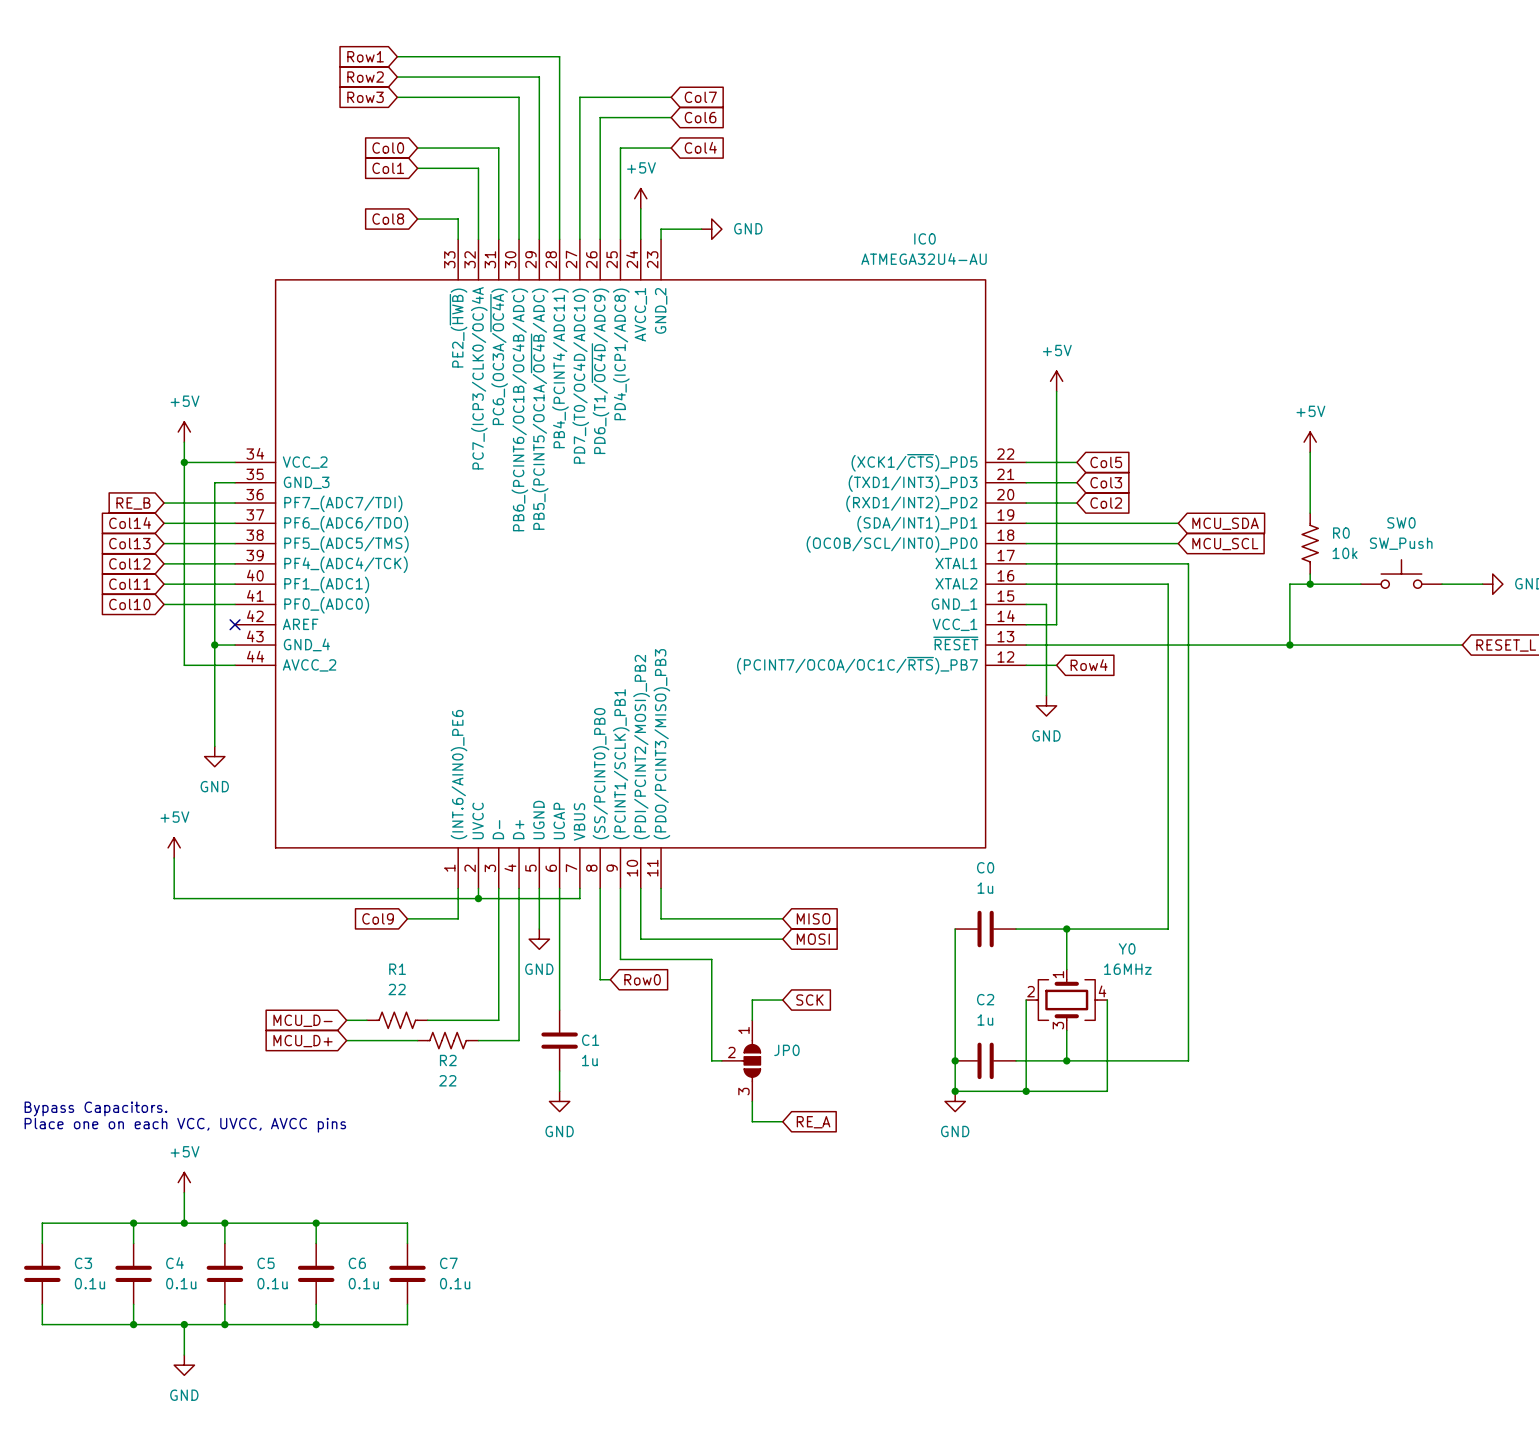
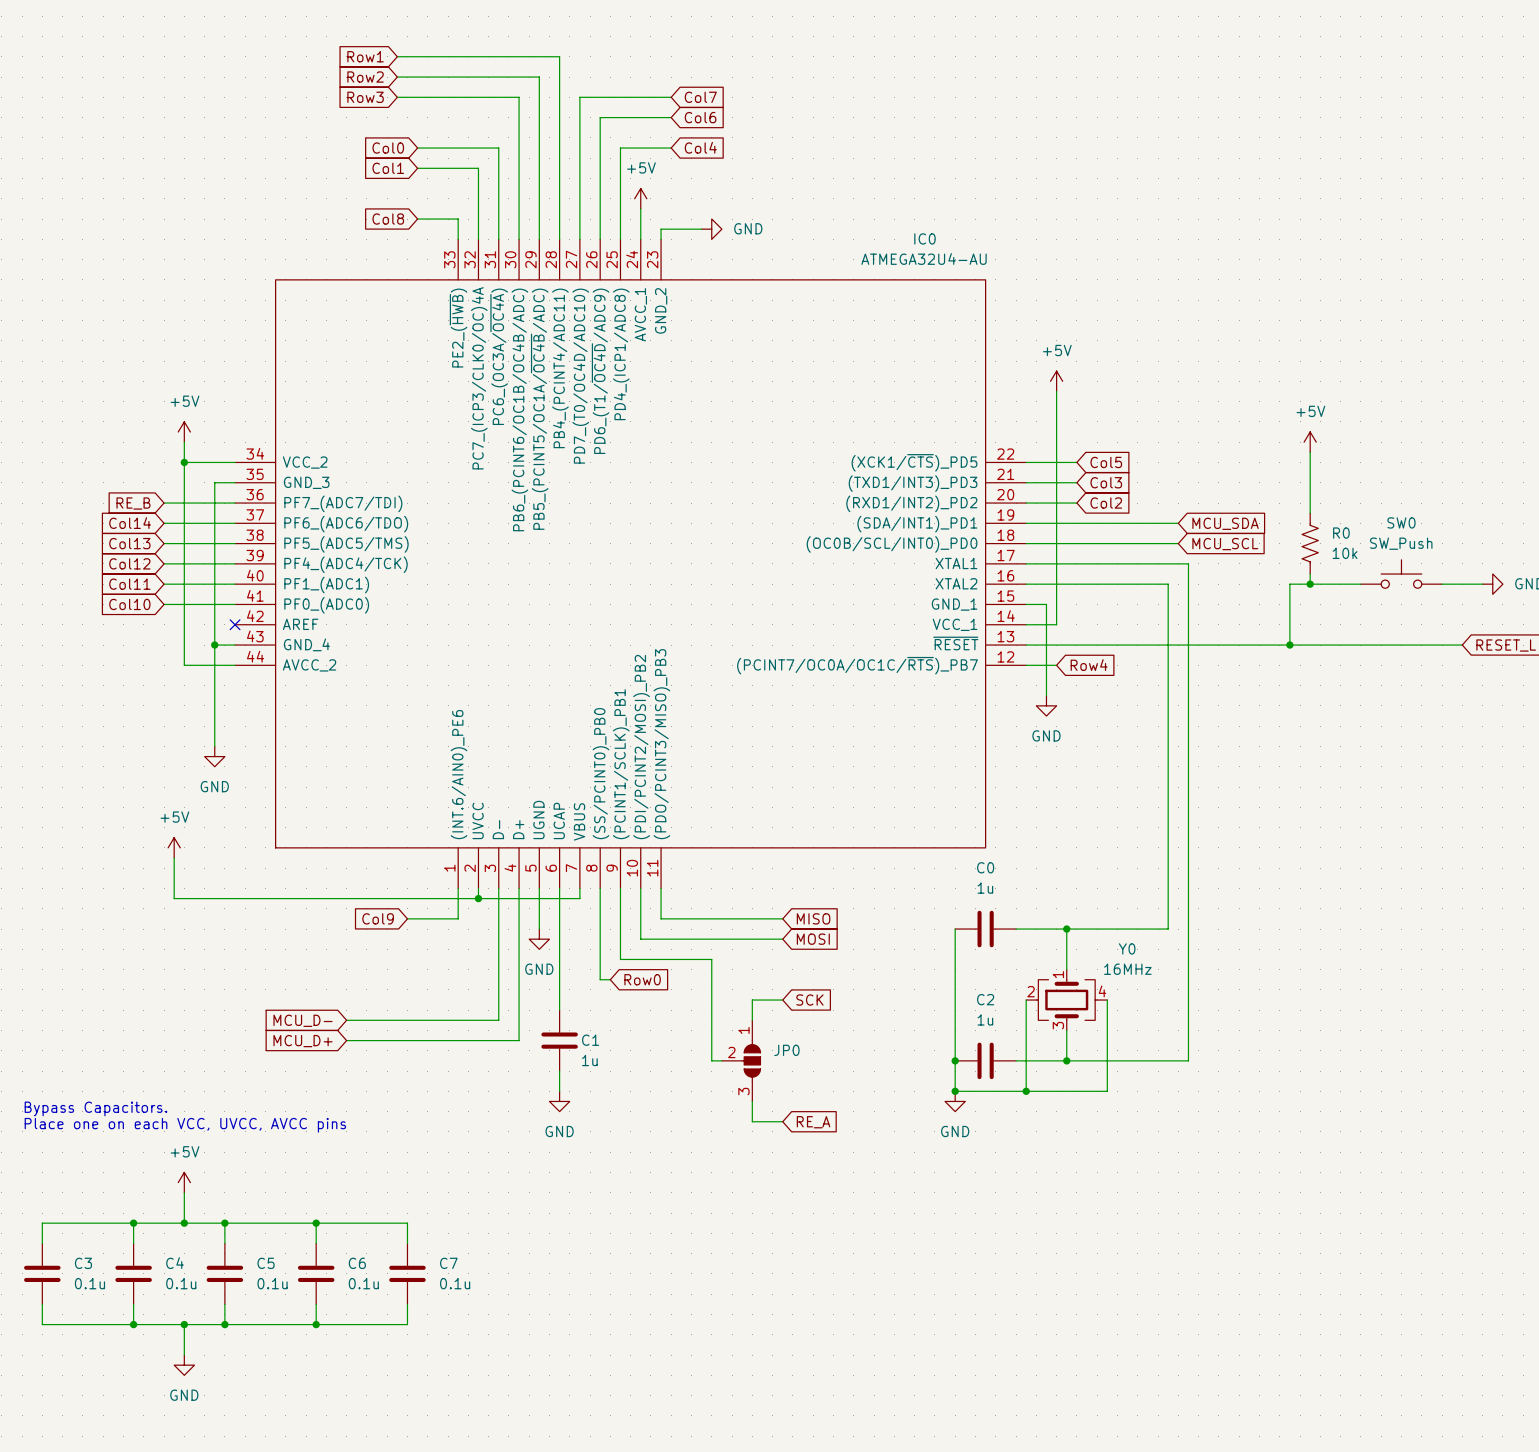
R1: 22 (397, 1020) -> none
R2: 22 (448, 1040) -> none

